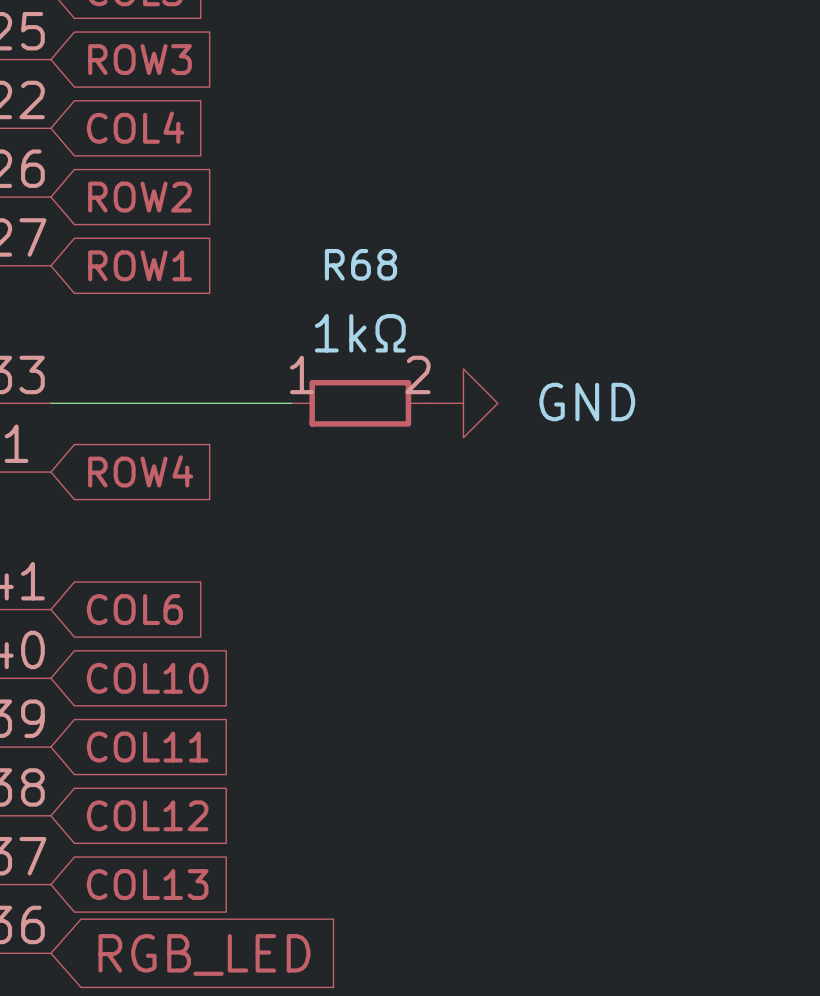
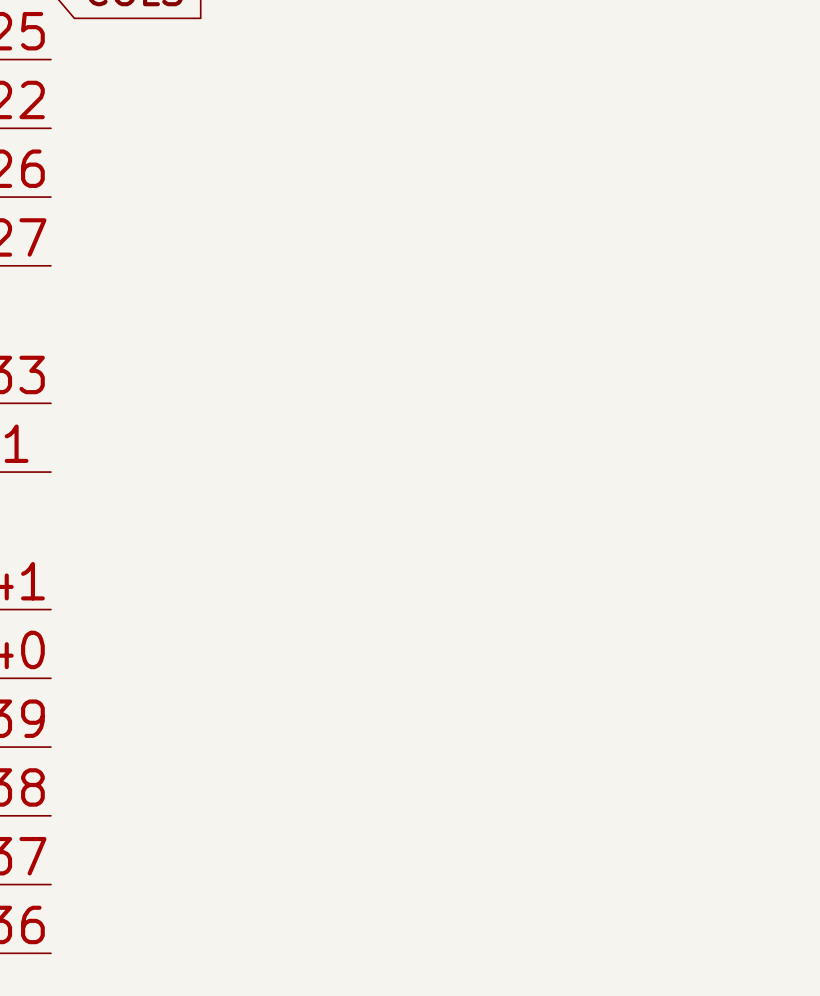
global label: ROW3 (140, 59) -> none
global label: COL4 (135, 127) -> none
global label: ROW2 (140, 197) -> none
global label: ROW1 (140, 265) -> none
wire: (50, 403) (291, 403) -> none
R68: 1kΩ (360, 403) -> none
power symbol: GND (463, 403) -> none
global label: ROW4 (140, 471) -> none
global label: COL6 (134, 609) -> none
global label: COL10 (147, 678) -> none
global label: COL11 (147, 747) -> none
global label: COL12 (147, 815) -> none
global label: COL13 (147, 884) -> none
global label: RGB_LED (204, 954) -> none

